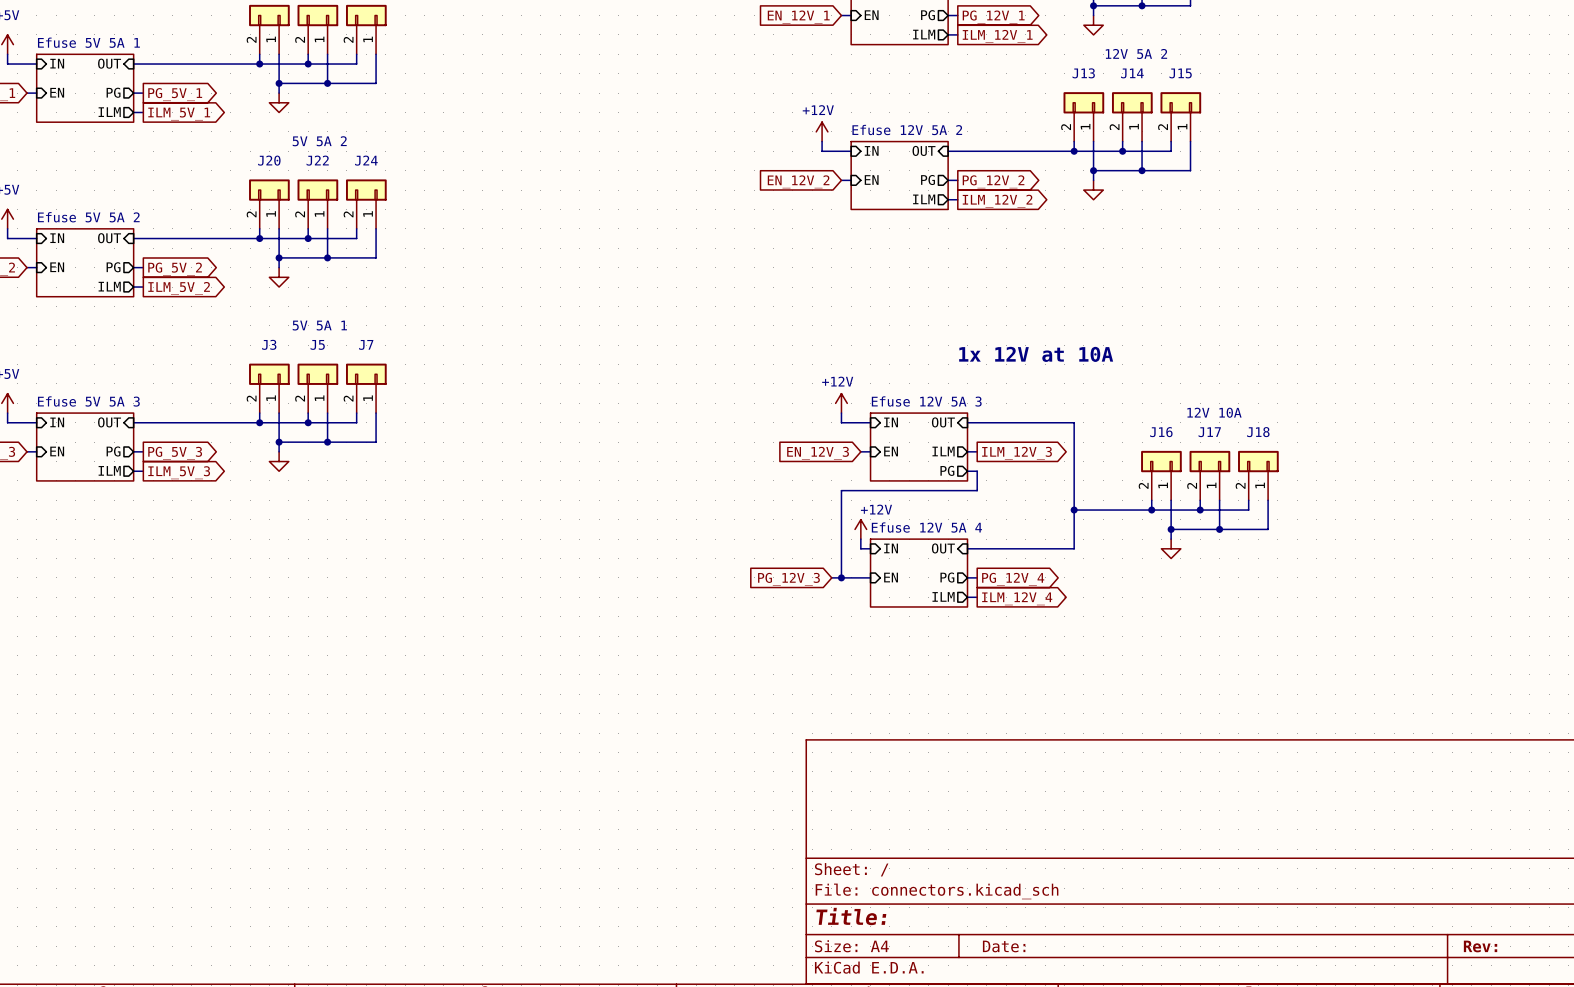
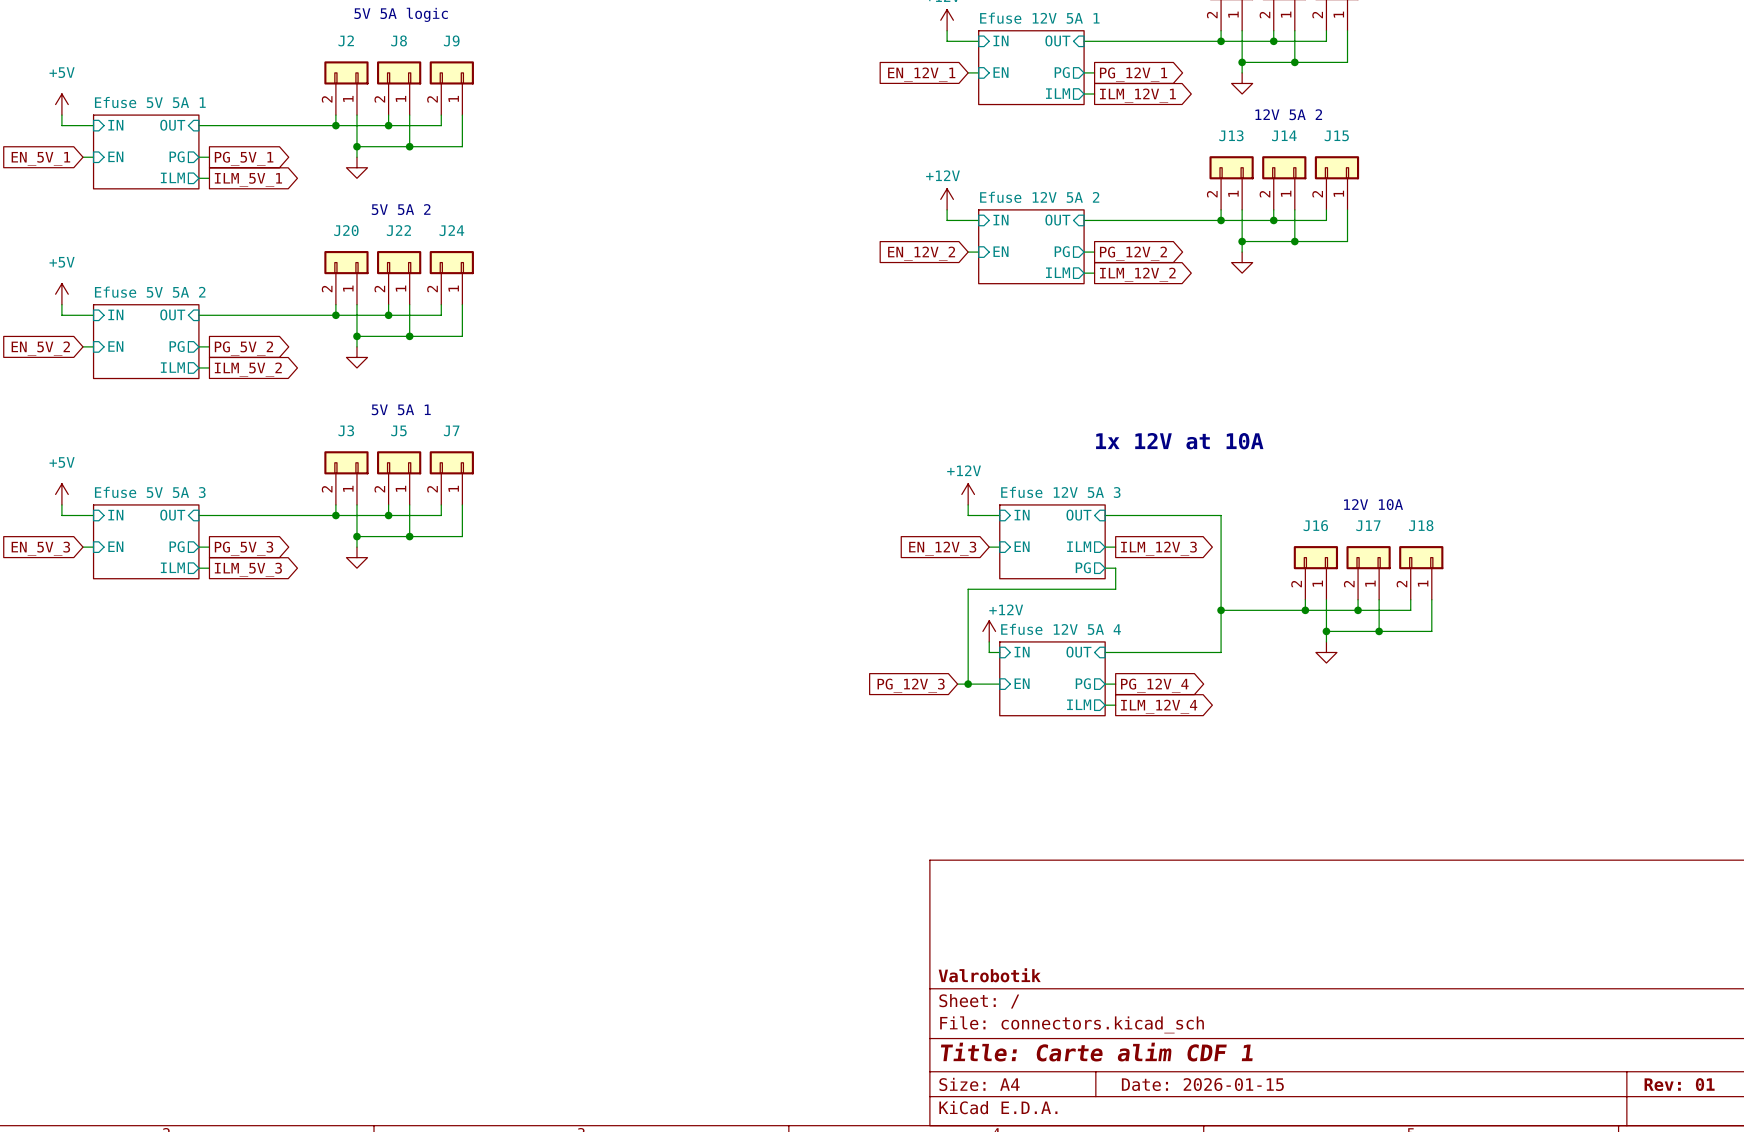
title block: none -> Valrobotik (989, 975)
title block: Title: (851, 916) -> Title: Carte alim CDF 1 (1096, 1052)
title block: Date: (1004, 946) -> Date: 2026-01-15 (1202, 1084)
title block: Rev: (1480, 946) -> Rev: 01 (1679, 1084)

